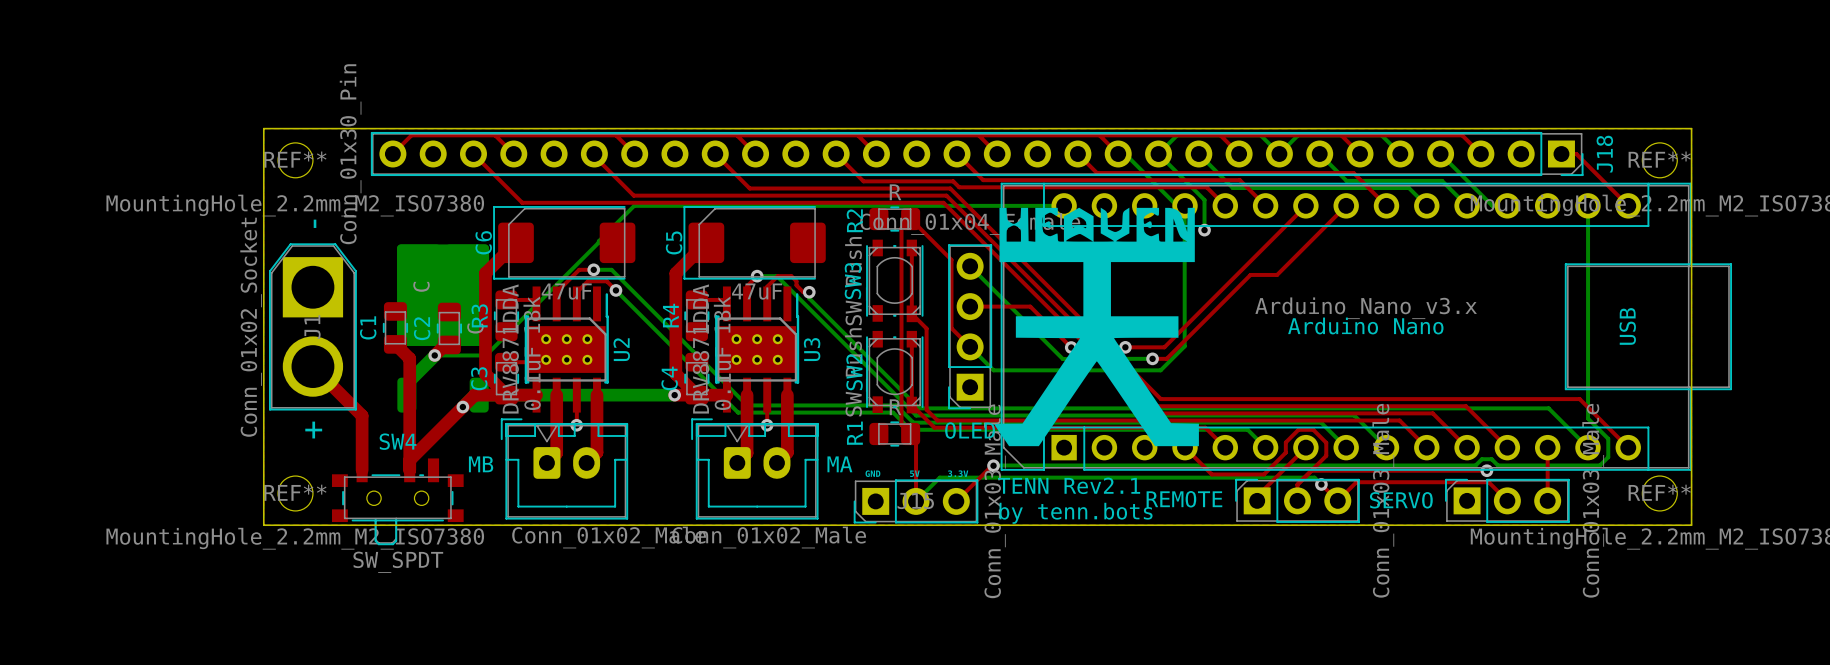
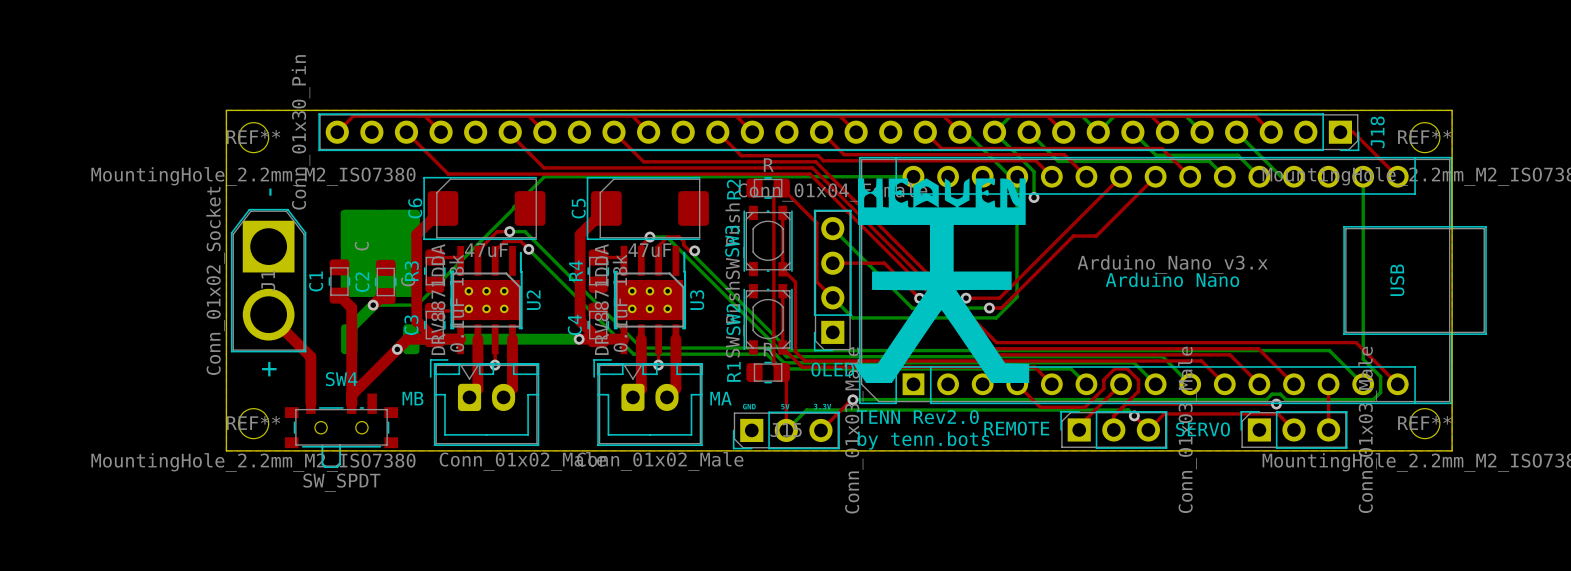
text: TENN Rev2.1 (1069, 485) -> TENN Rev2.0 (917, 417)

